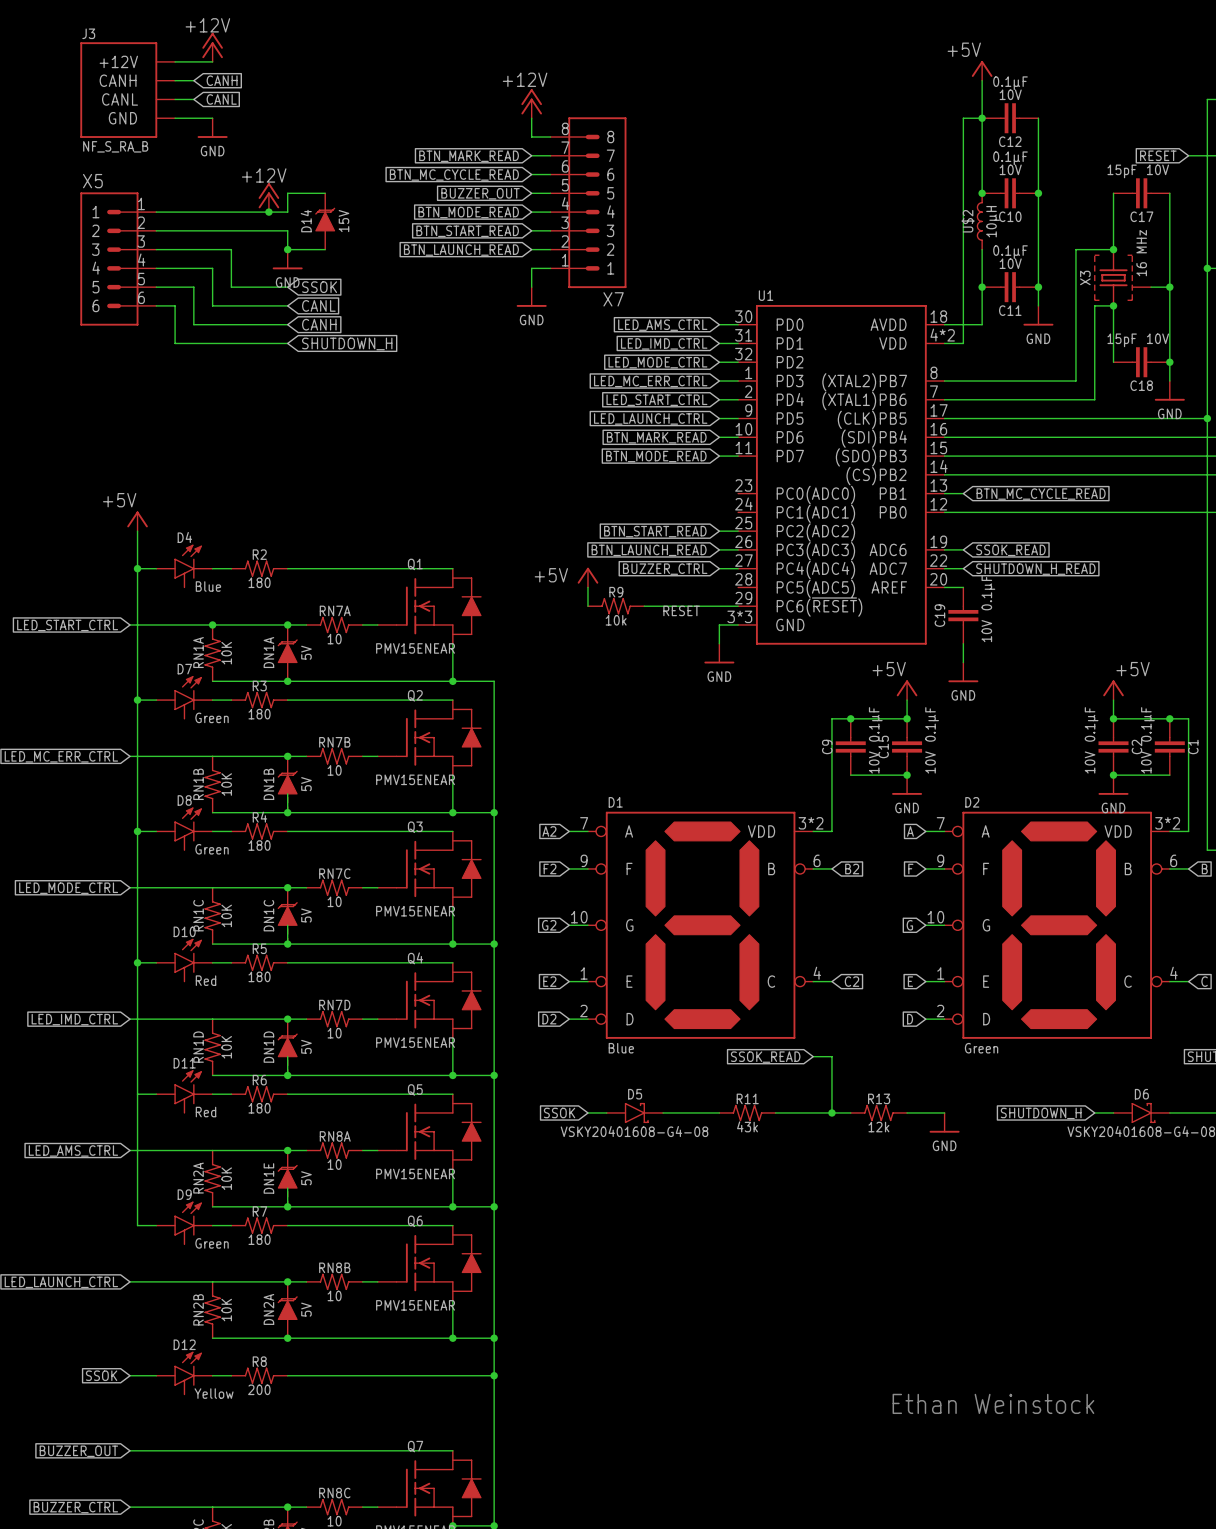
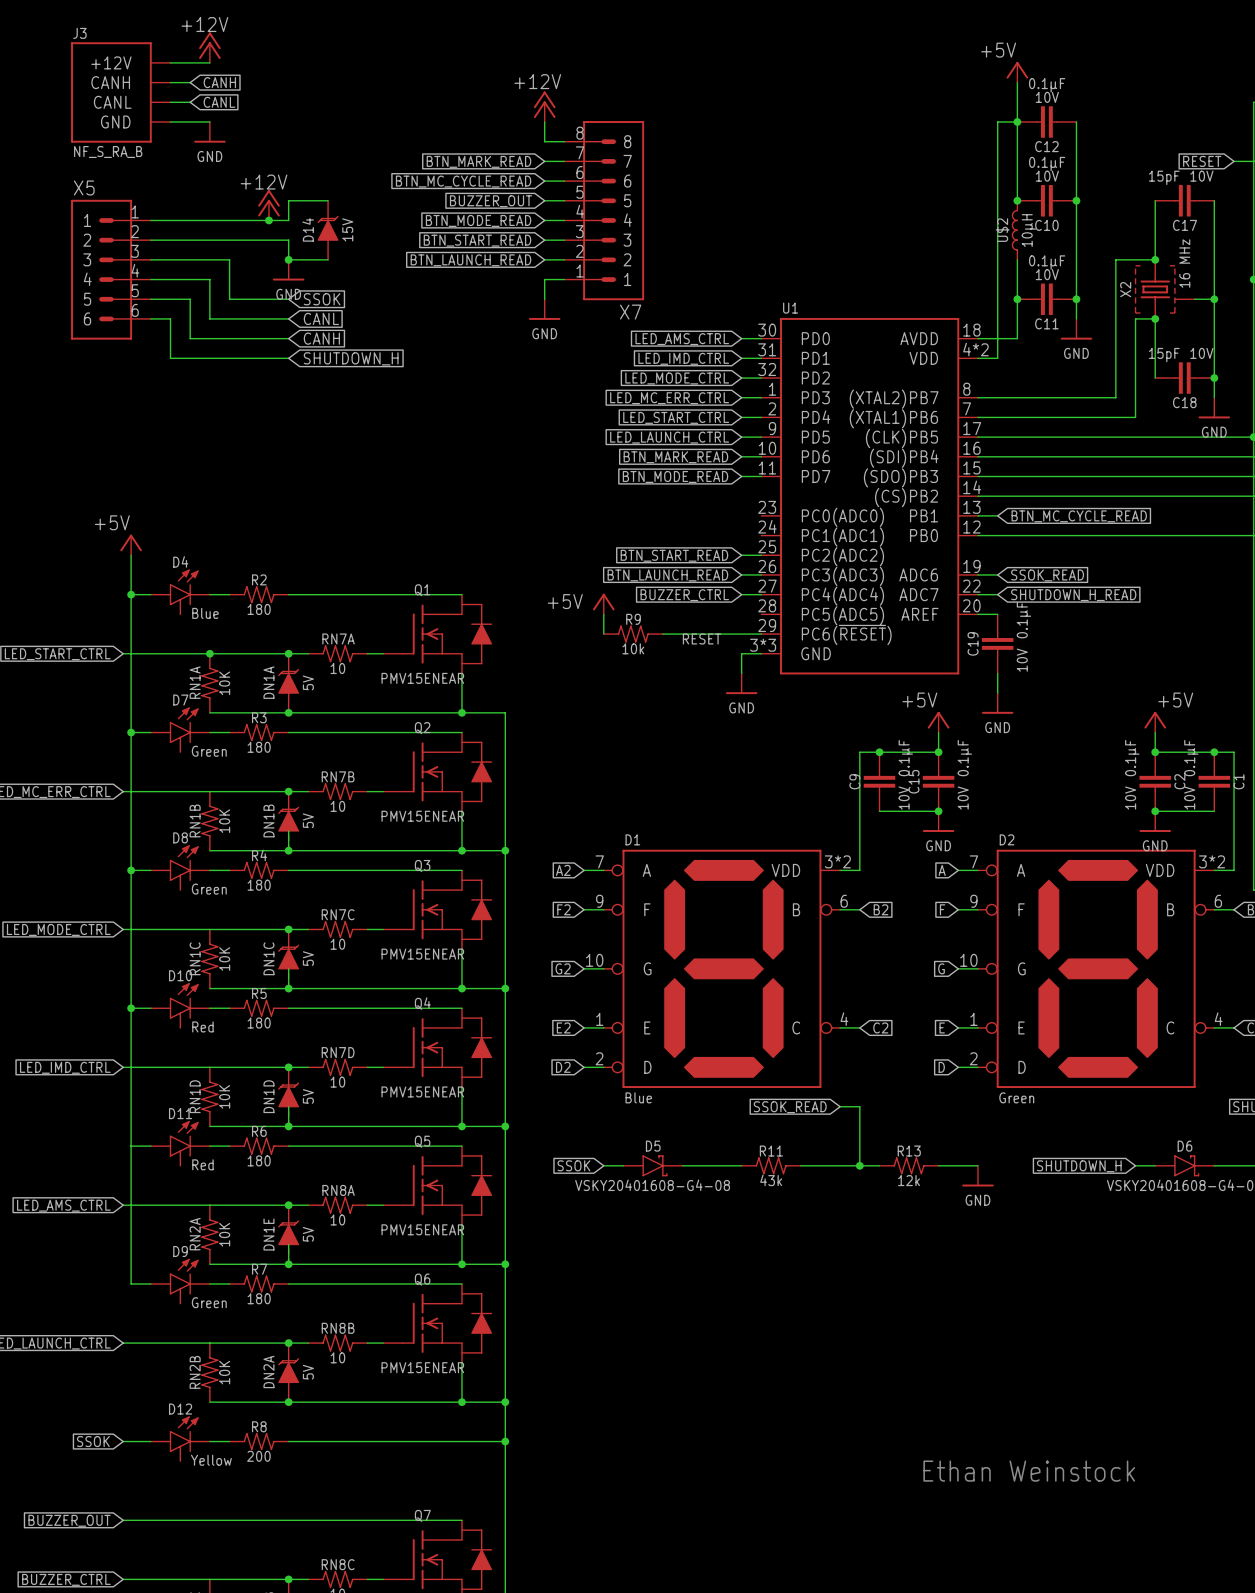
X3 name: X3 (1085, 277) -> X2 (1125, 289)

